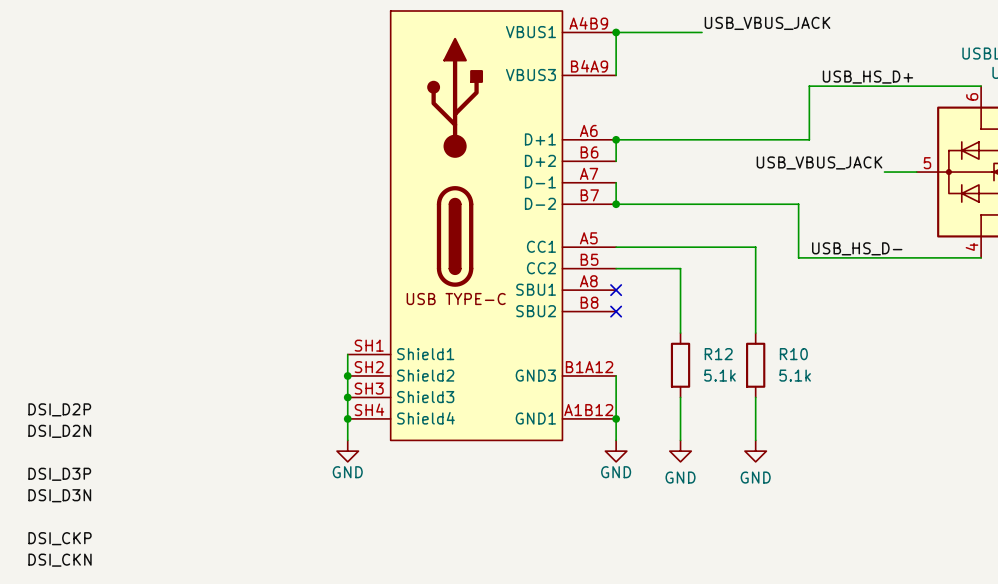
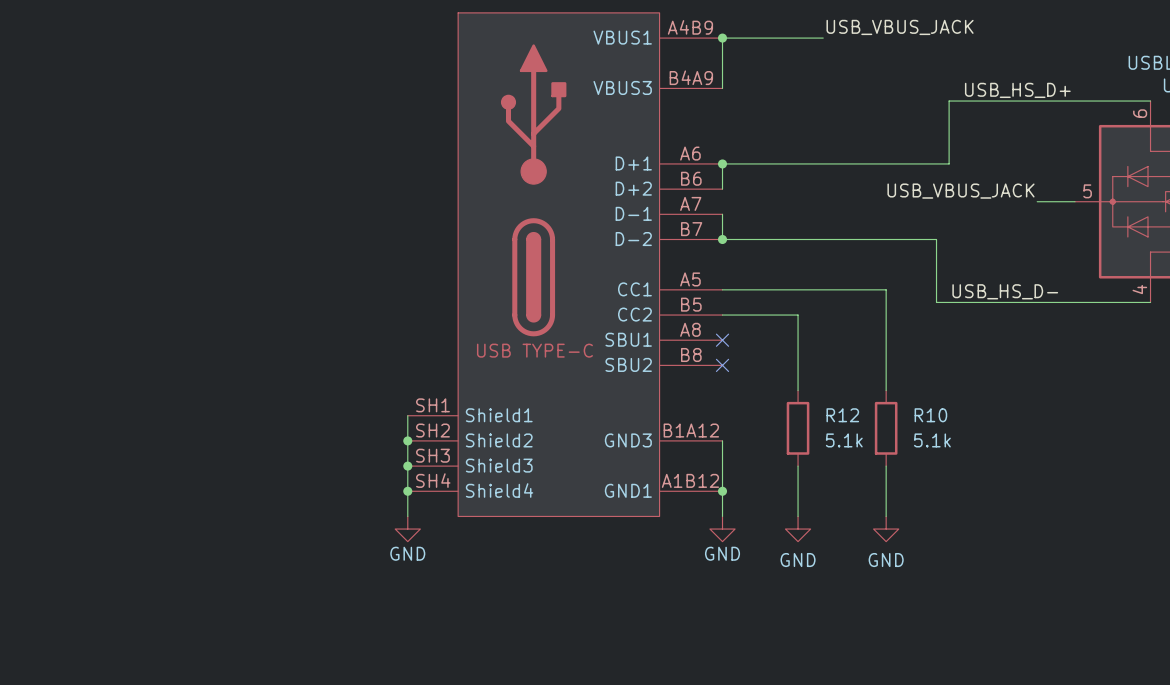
label: DSI_D2P (59, 409) -> none
label: DSI_D2N (59, 431) -> none
label: DSI_D3P (59, 474) -> none
label: DSI_D3N (59, 495) -> none
label: DSI_CKP (60, 538) -> none
label: DSI_CKN (60, 560) -> none

